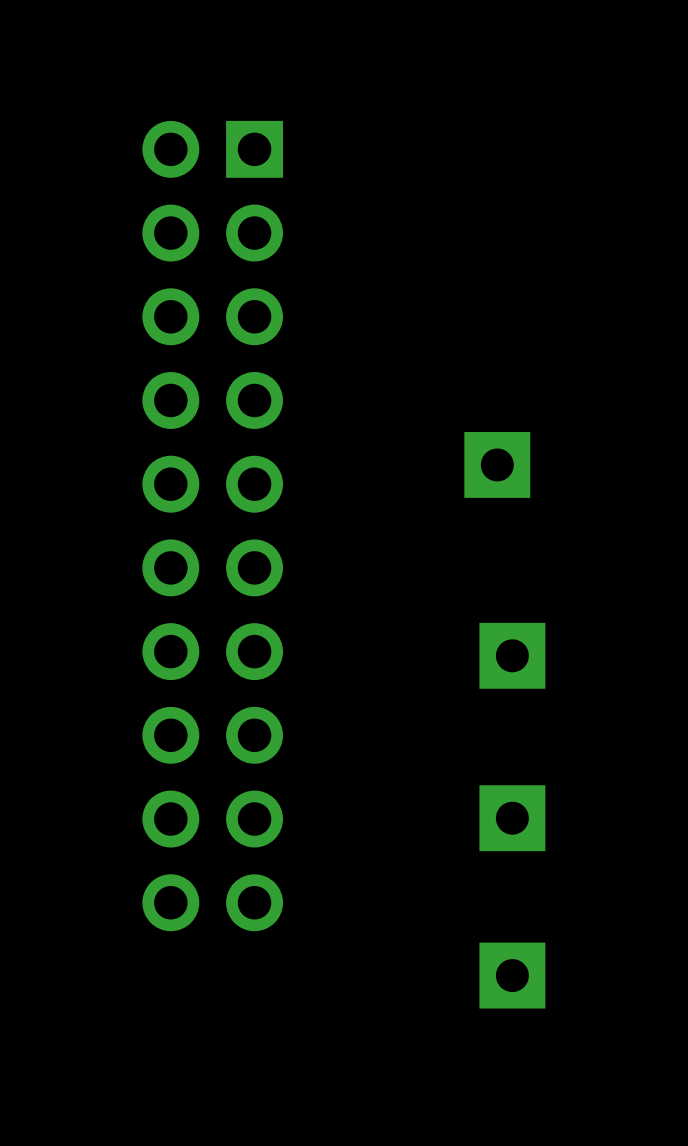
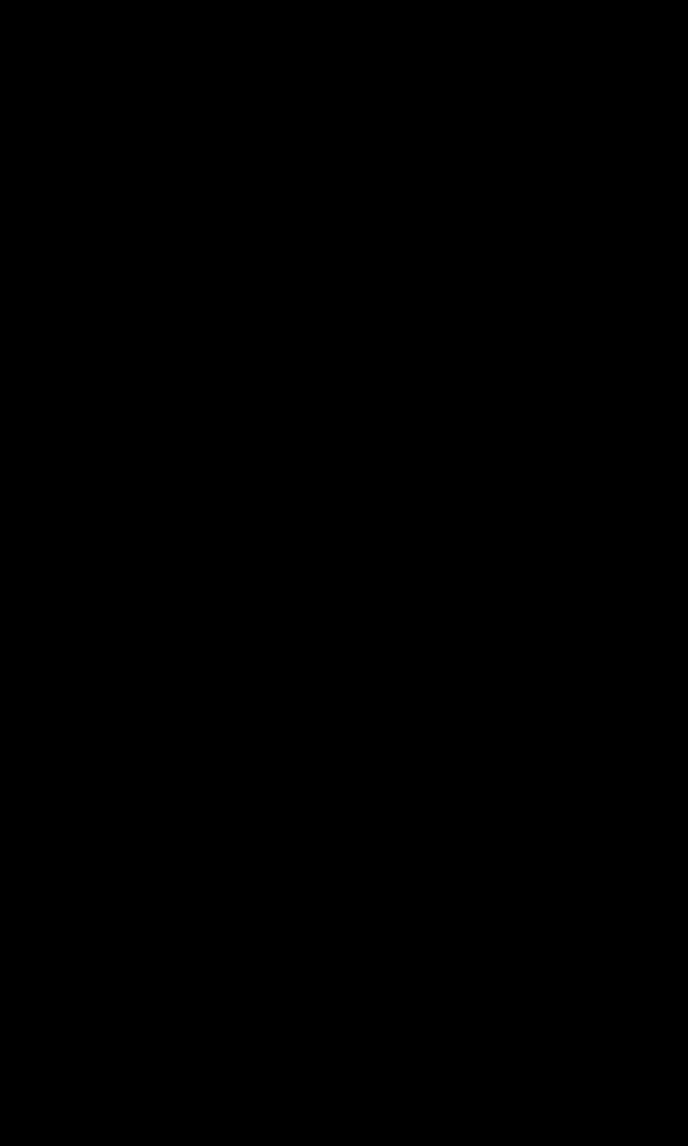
part: (497, 464) -> none
part: (212, 526) -> none
part: (512, 655) -> none
part: (512, 818) -> none
part: (512, 975) -> none

